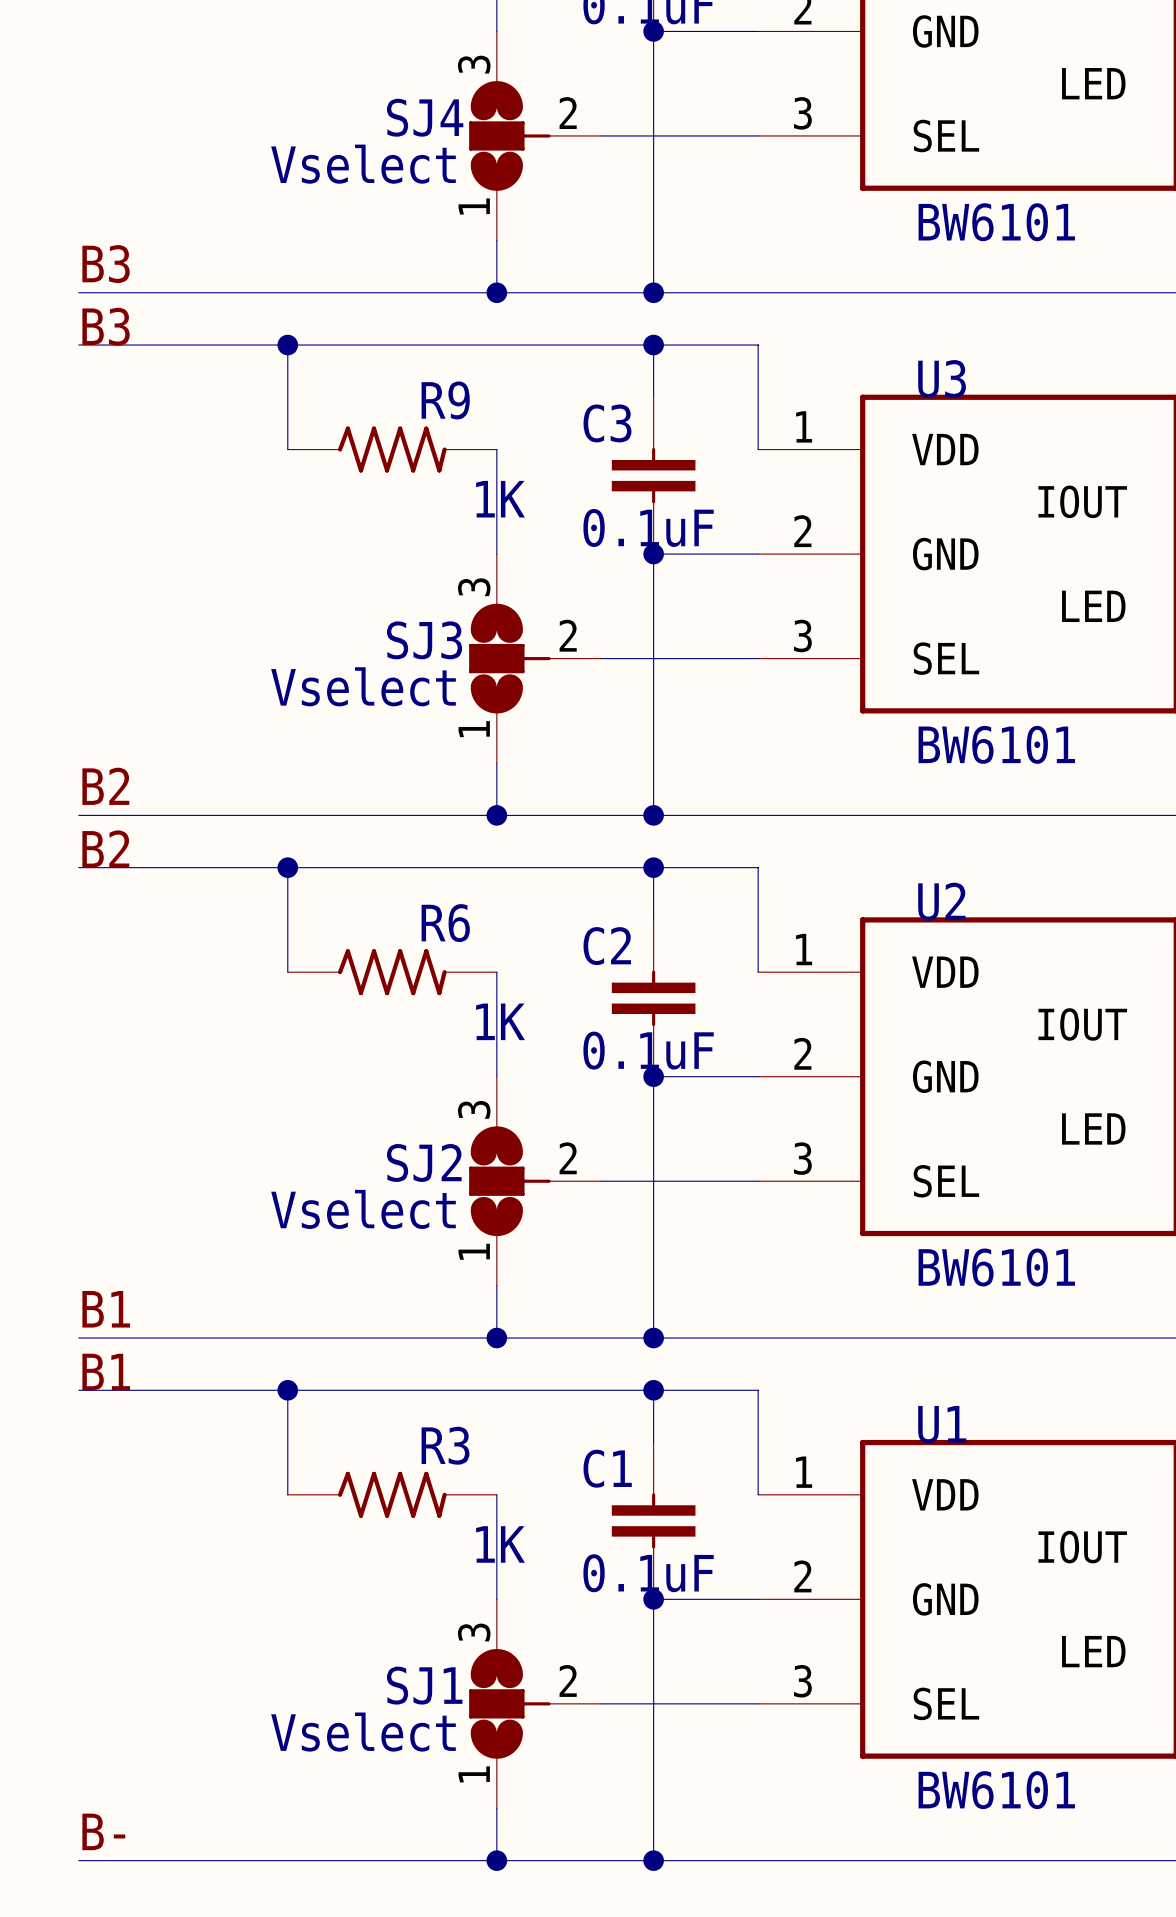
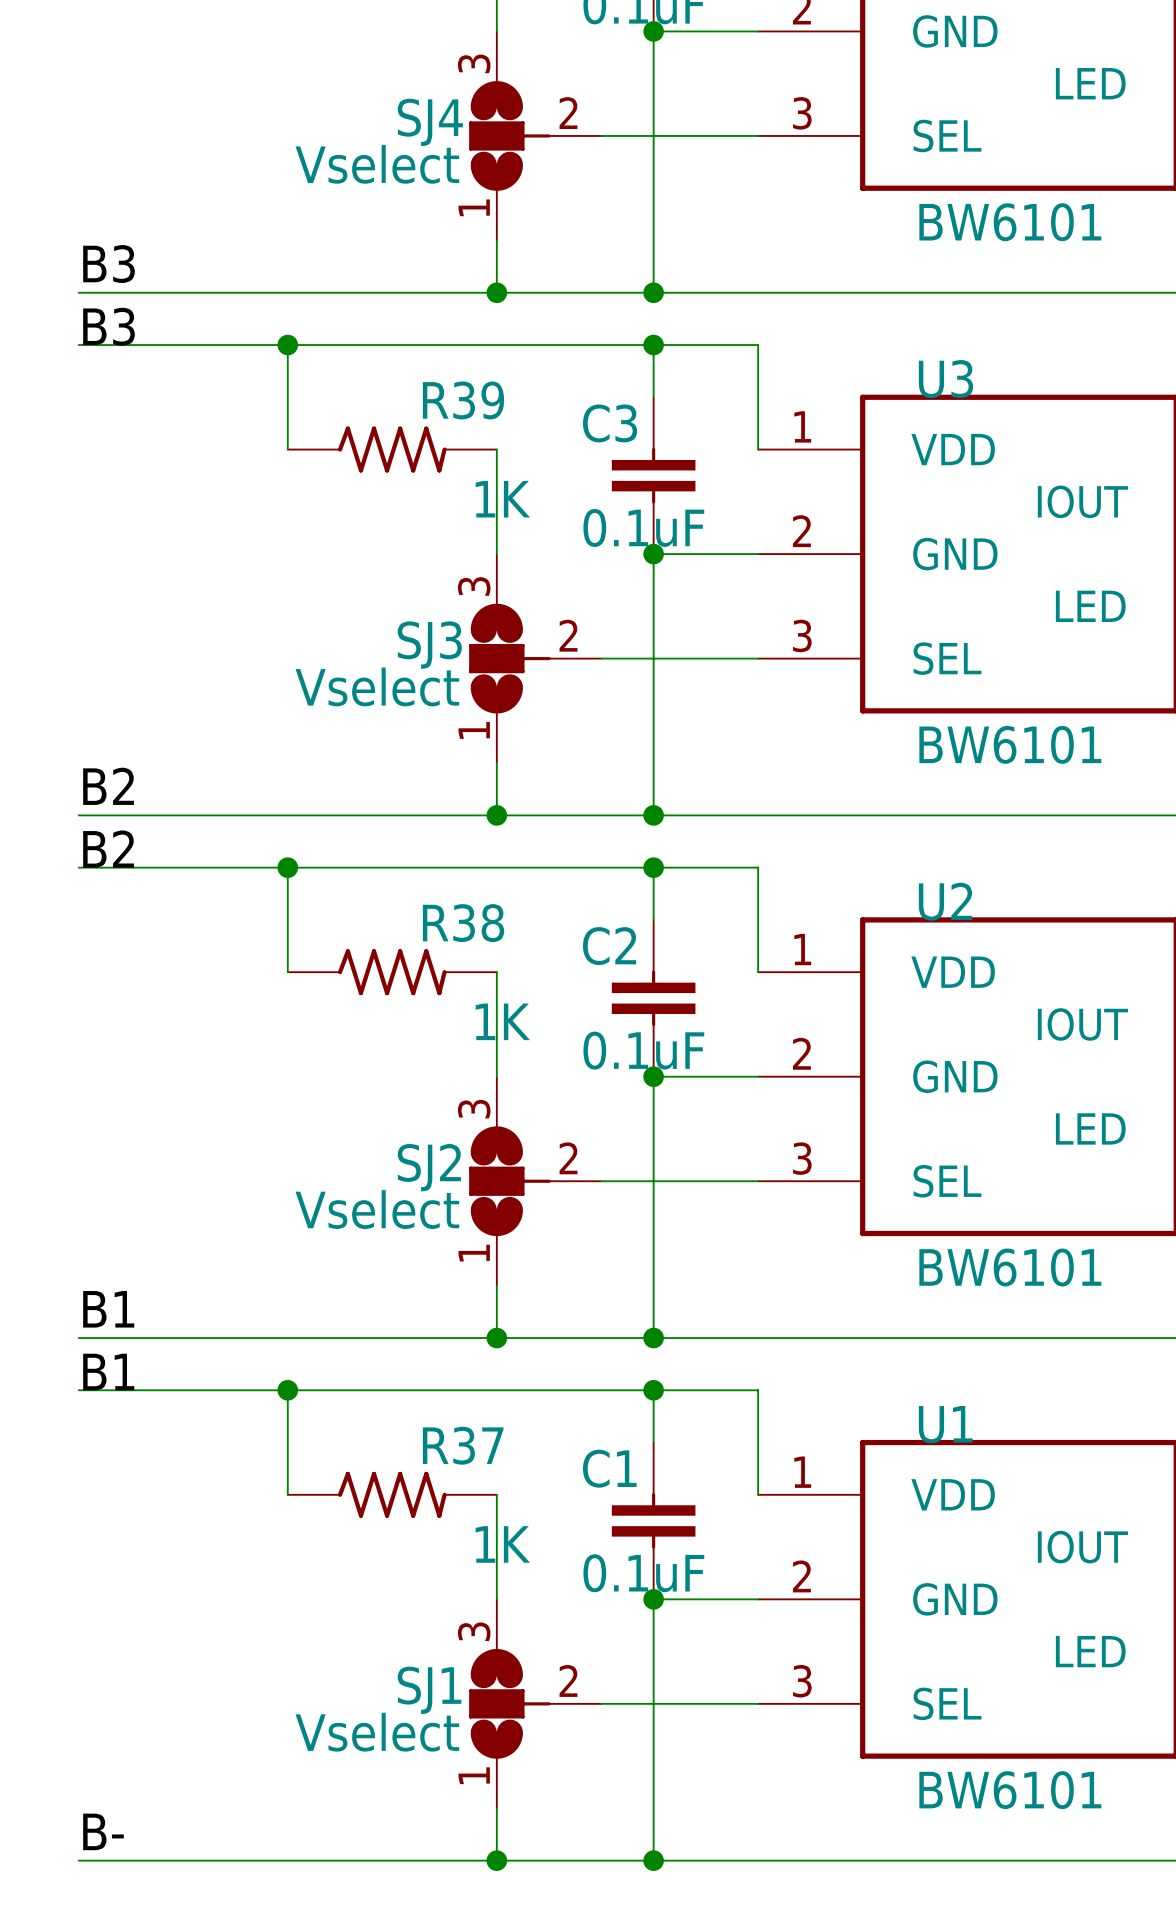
R9 name: R9 (445, 400) -> R39 (463, 400)
R6 name: R6 (445, 923) -> R38 (463, 923)
R3 name: R3 (445, 1445) -> R37 (463, 1445)

